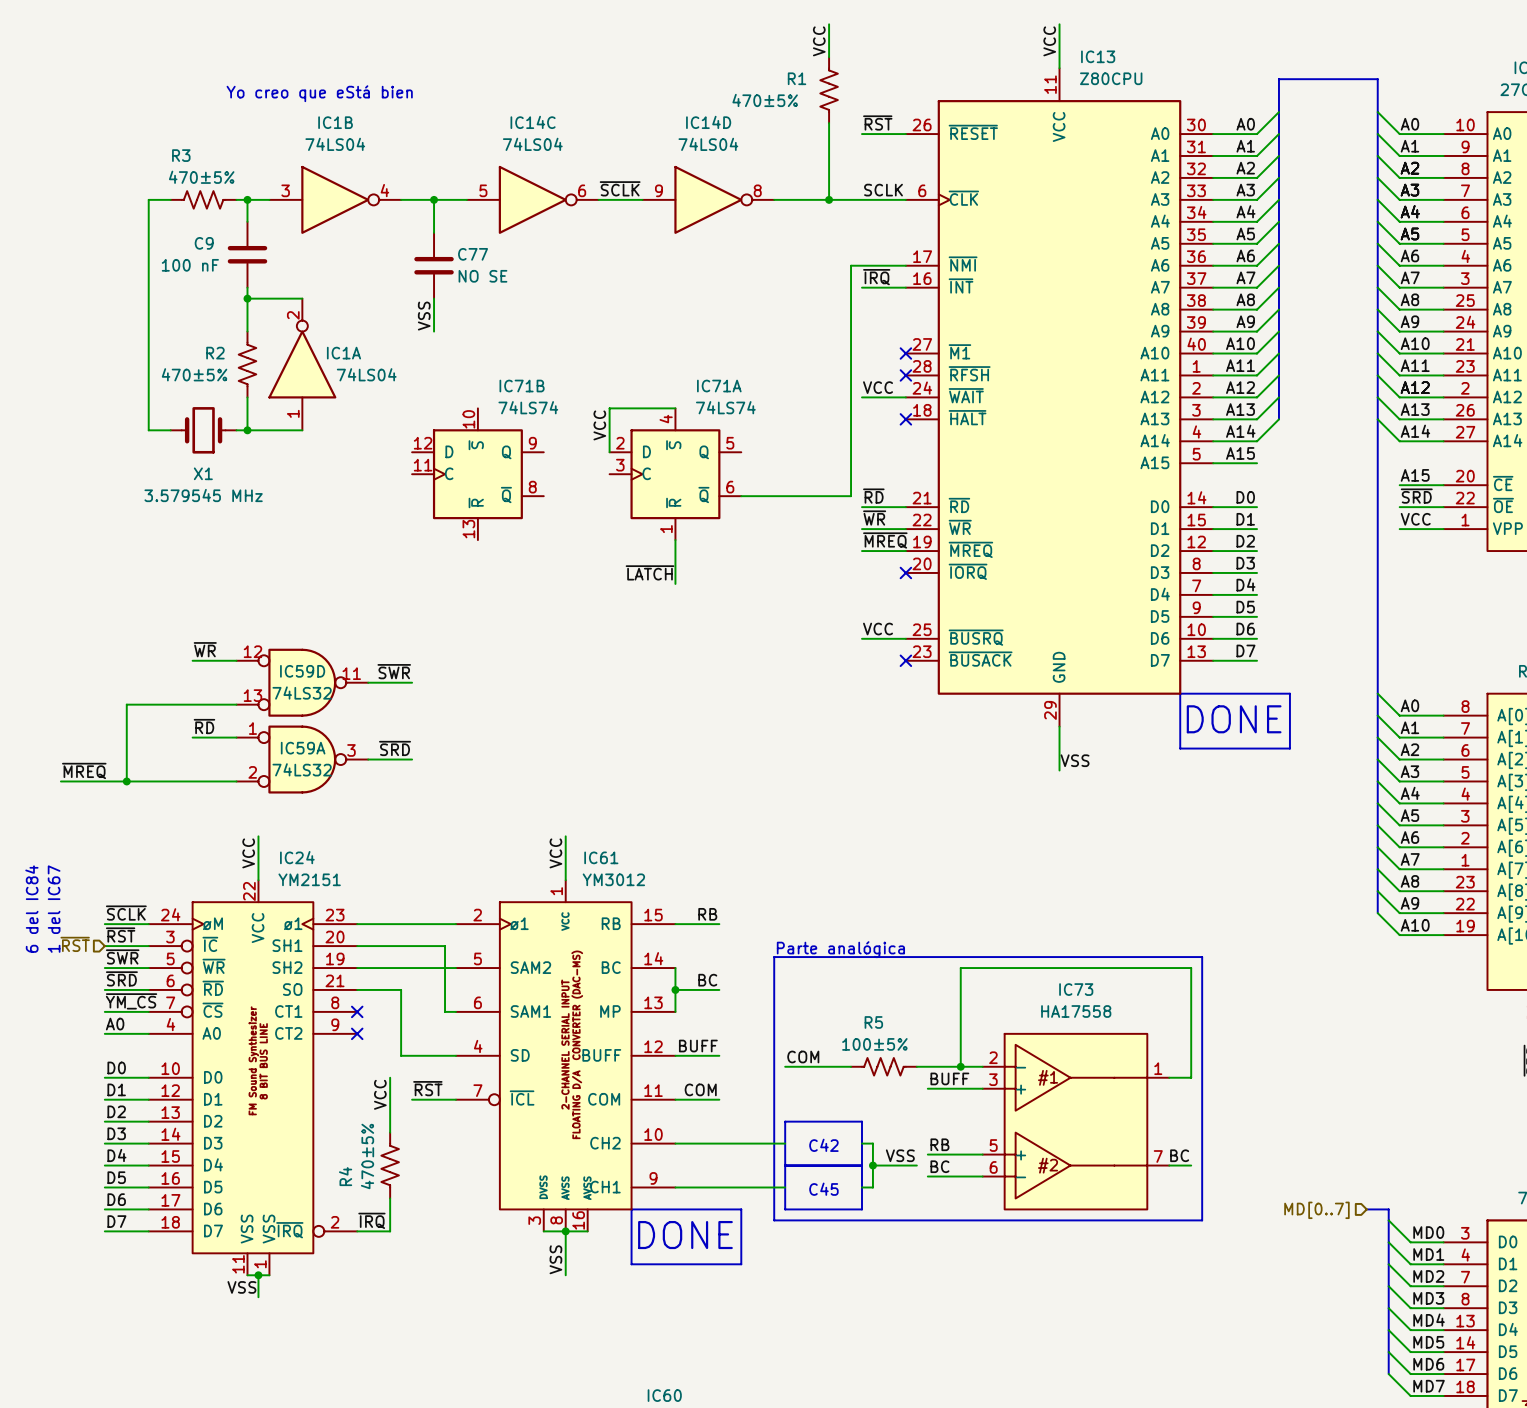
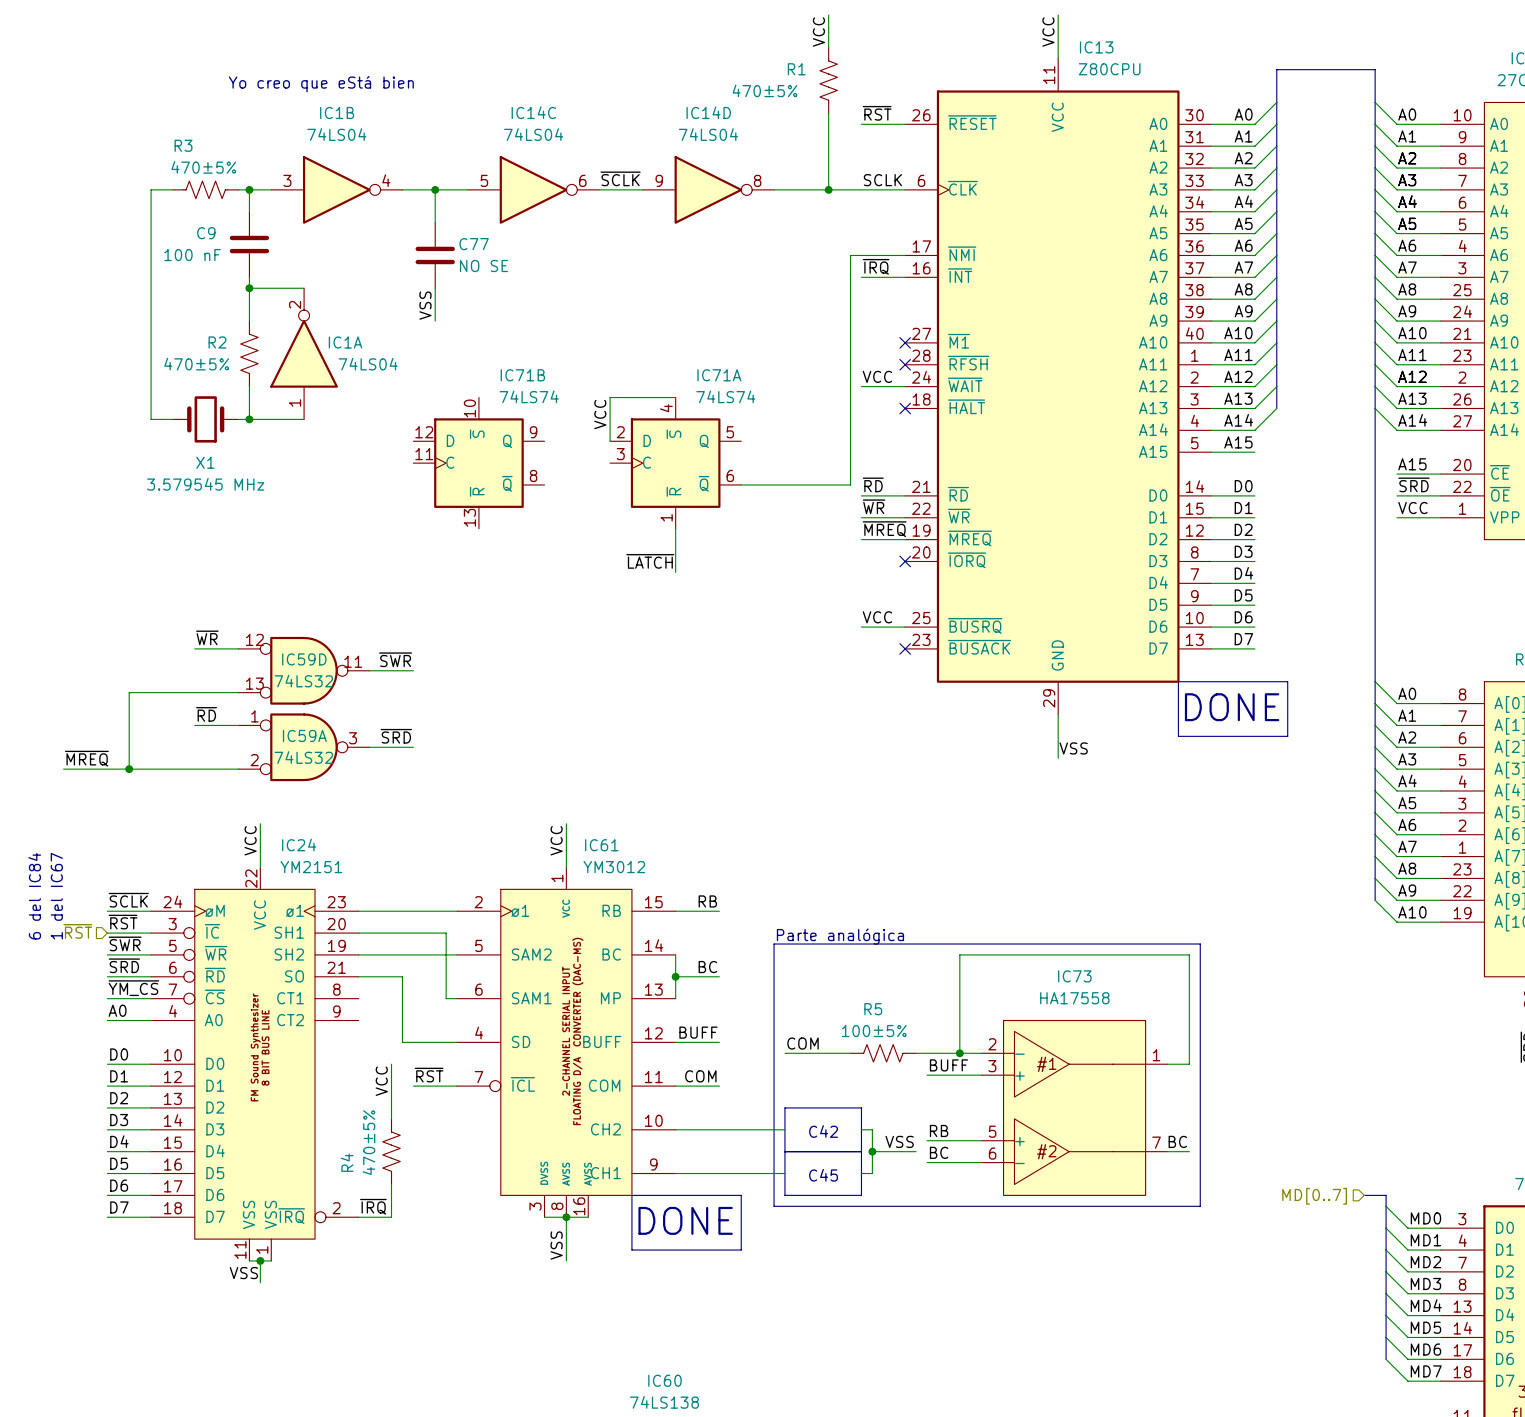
no-connect mark: (357, 1011) -> none
no-connect mark: (357, 1033) -> none

